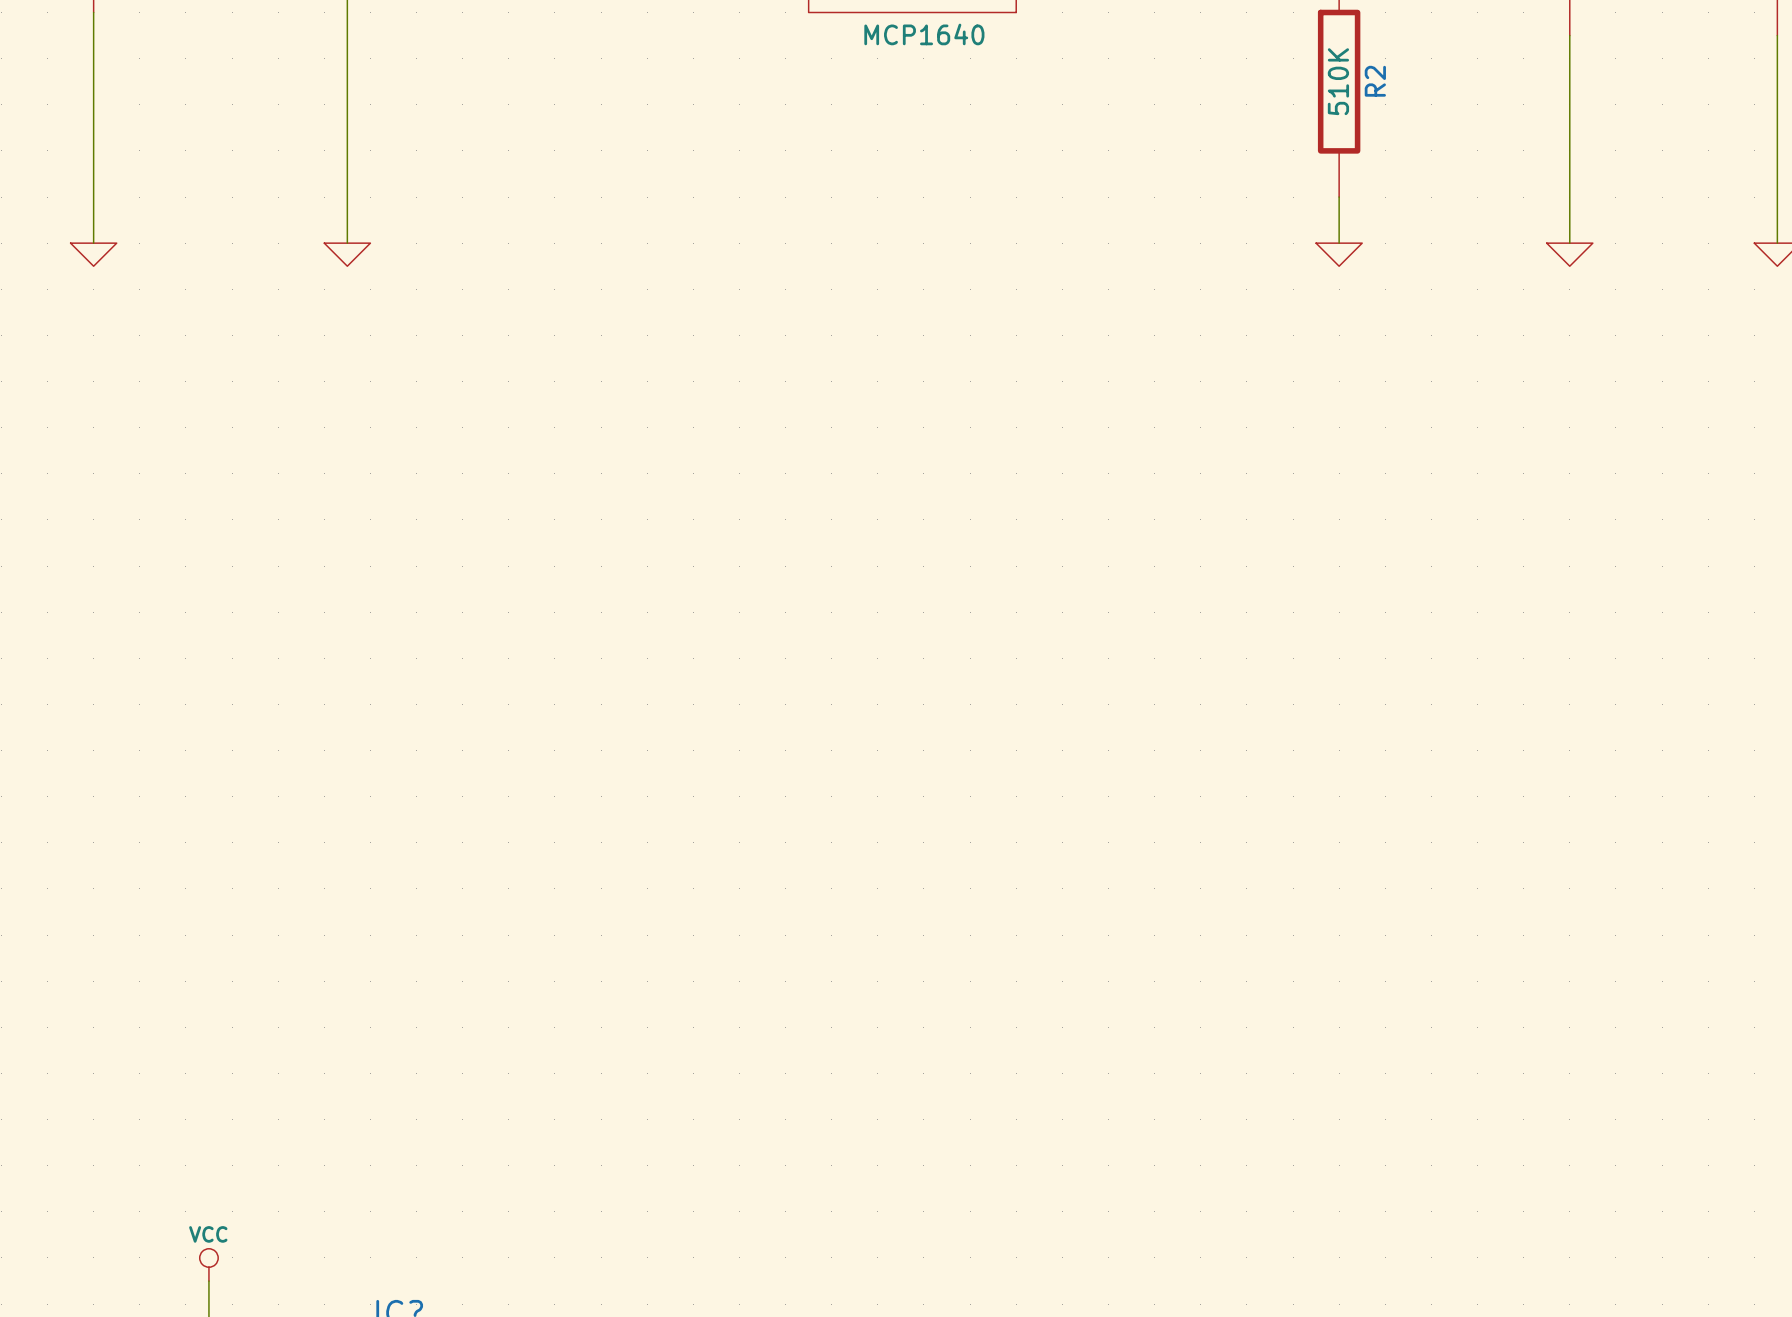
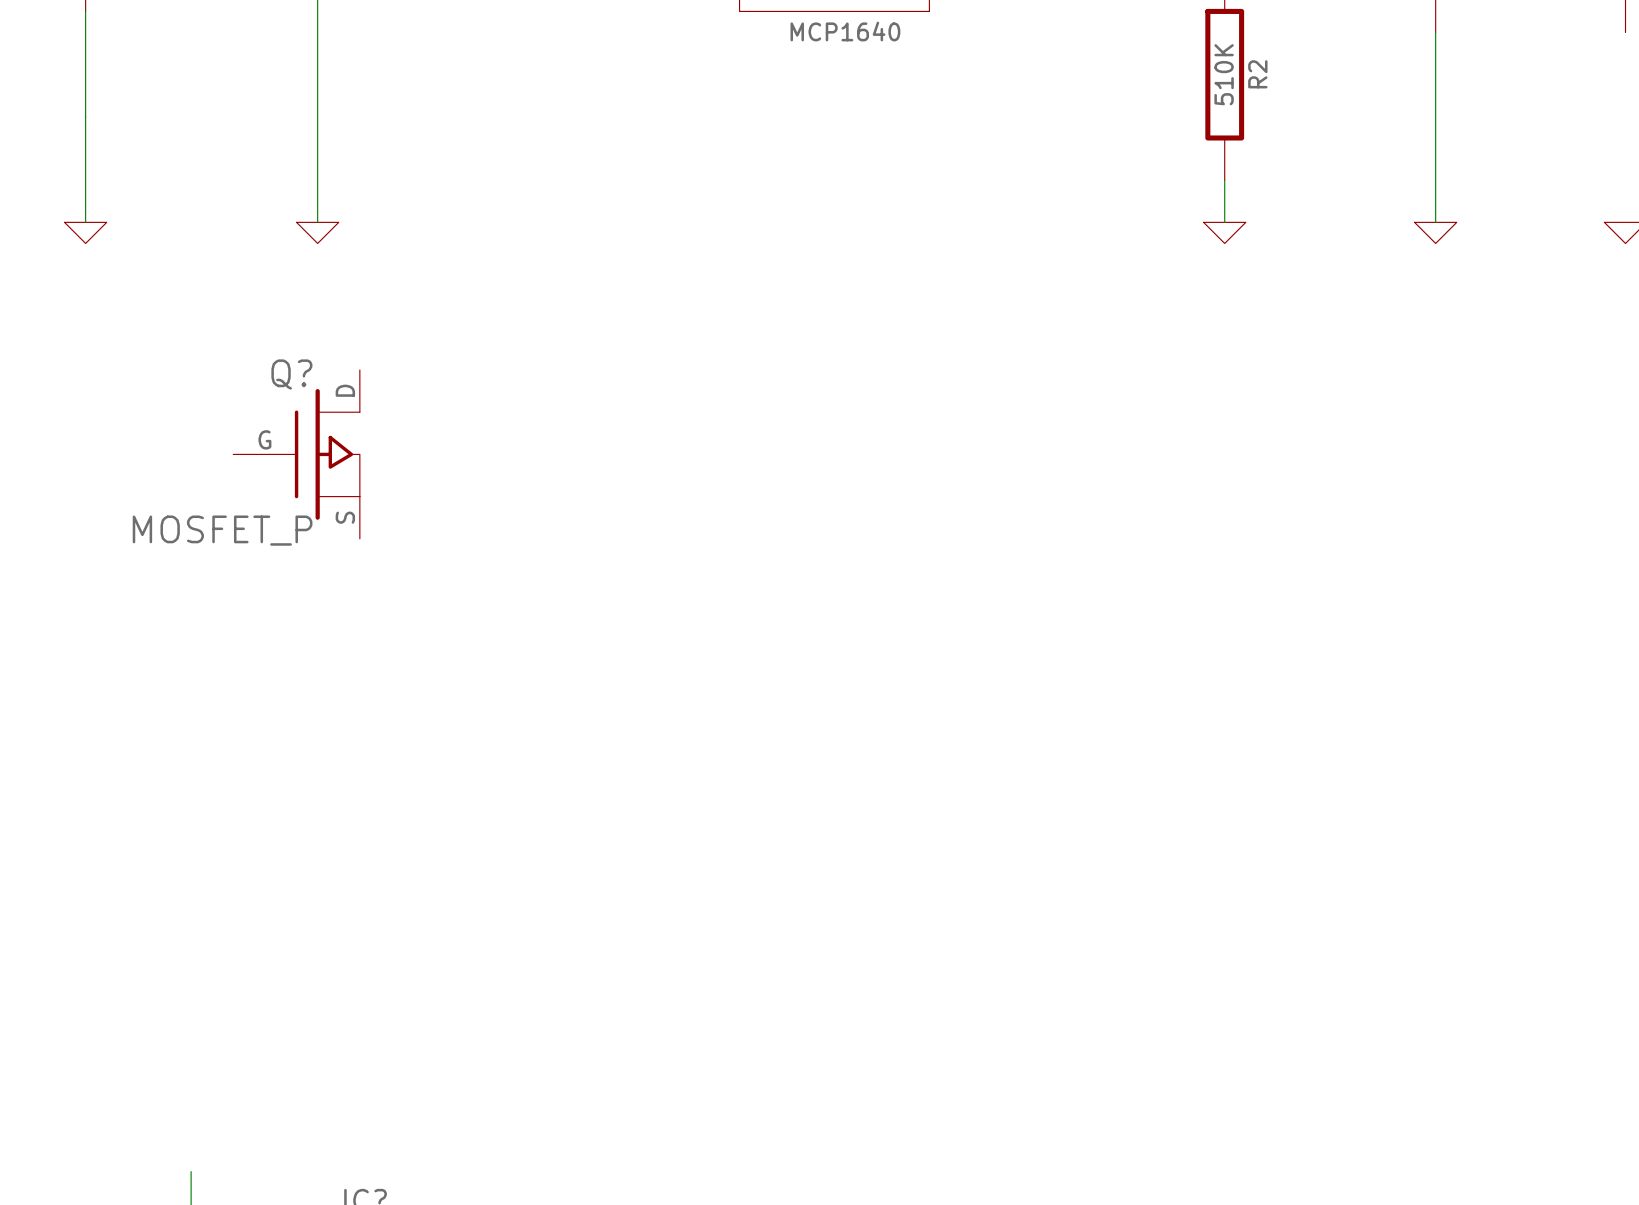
wire: (1777, 35) (1777, 243) -> none
Q?: none -> MOSFET_P (296, 454)
power symbol: VCC (208, 1264) -> none

